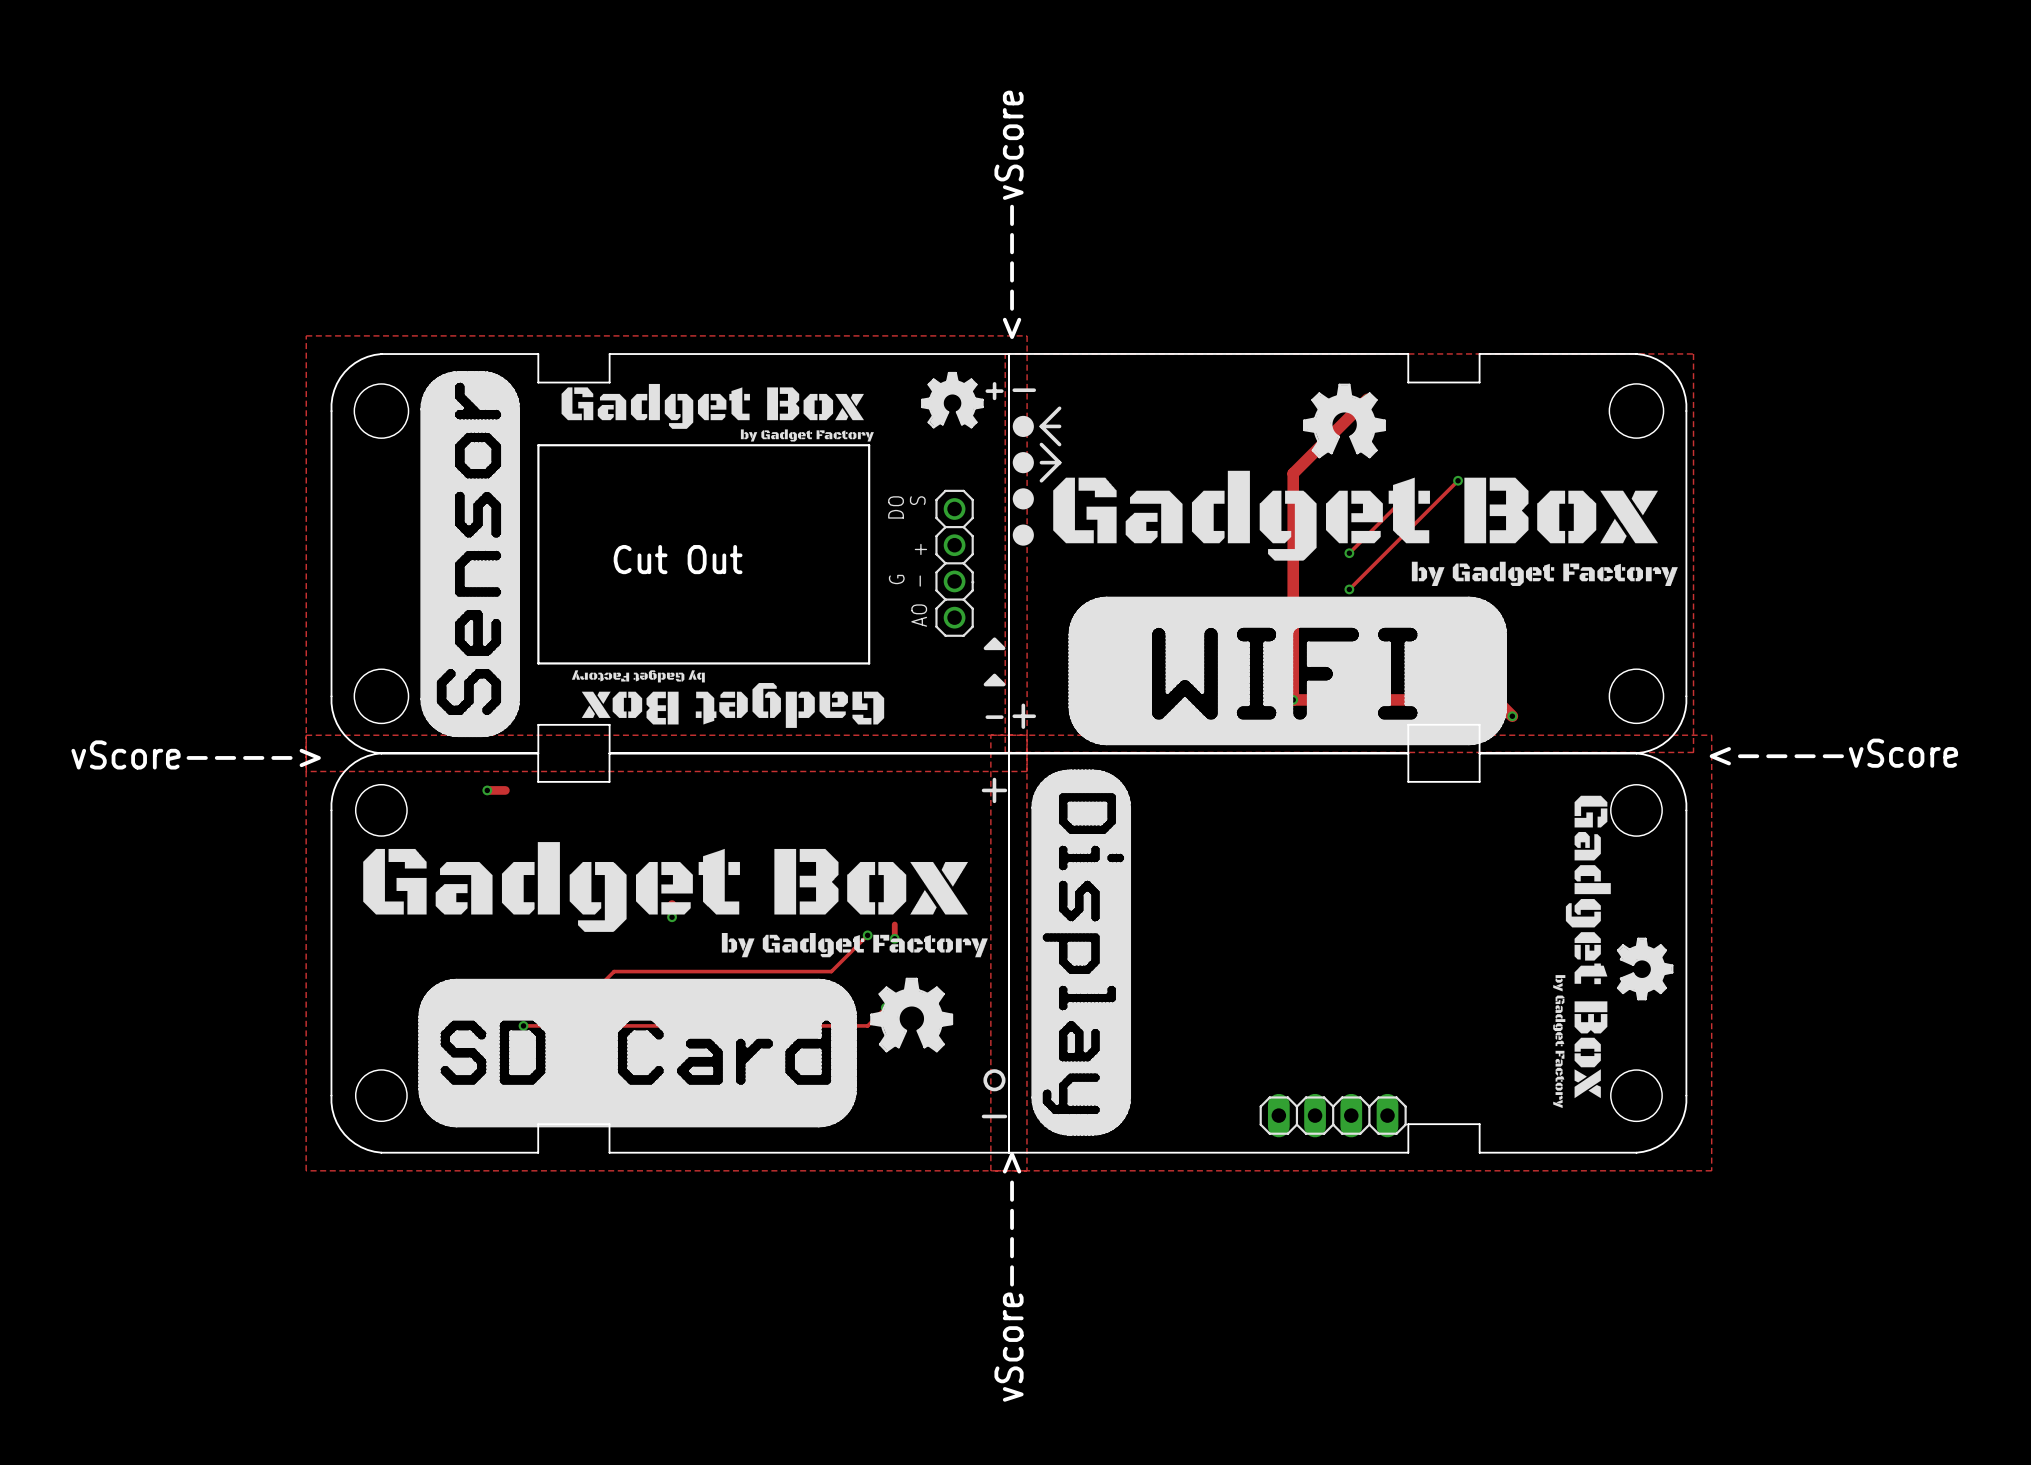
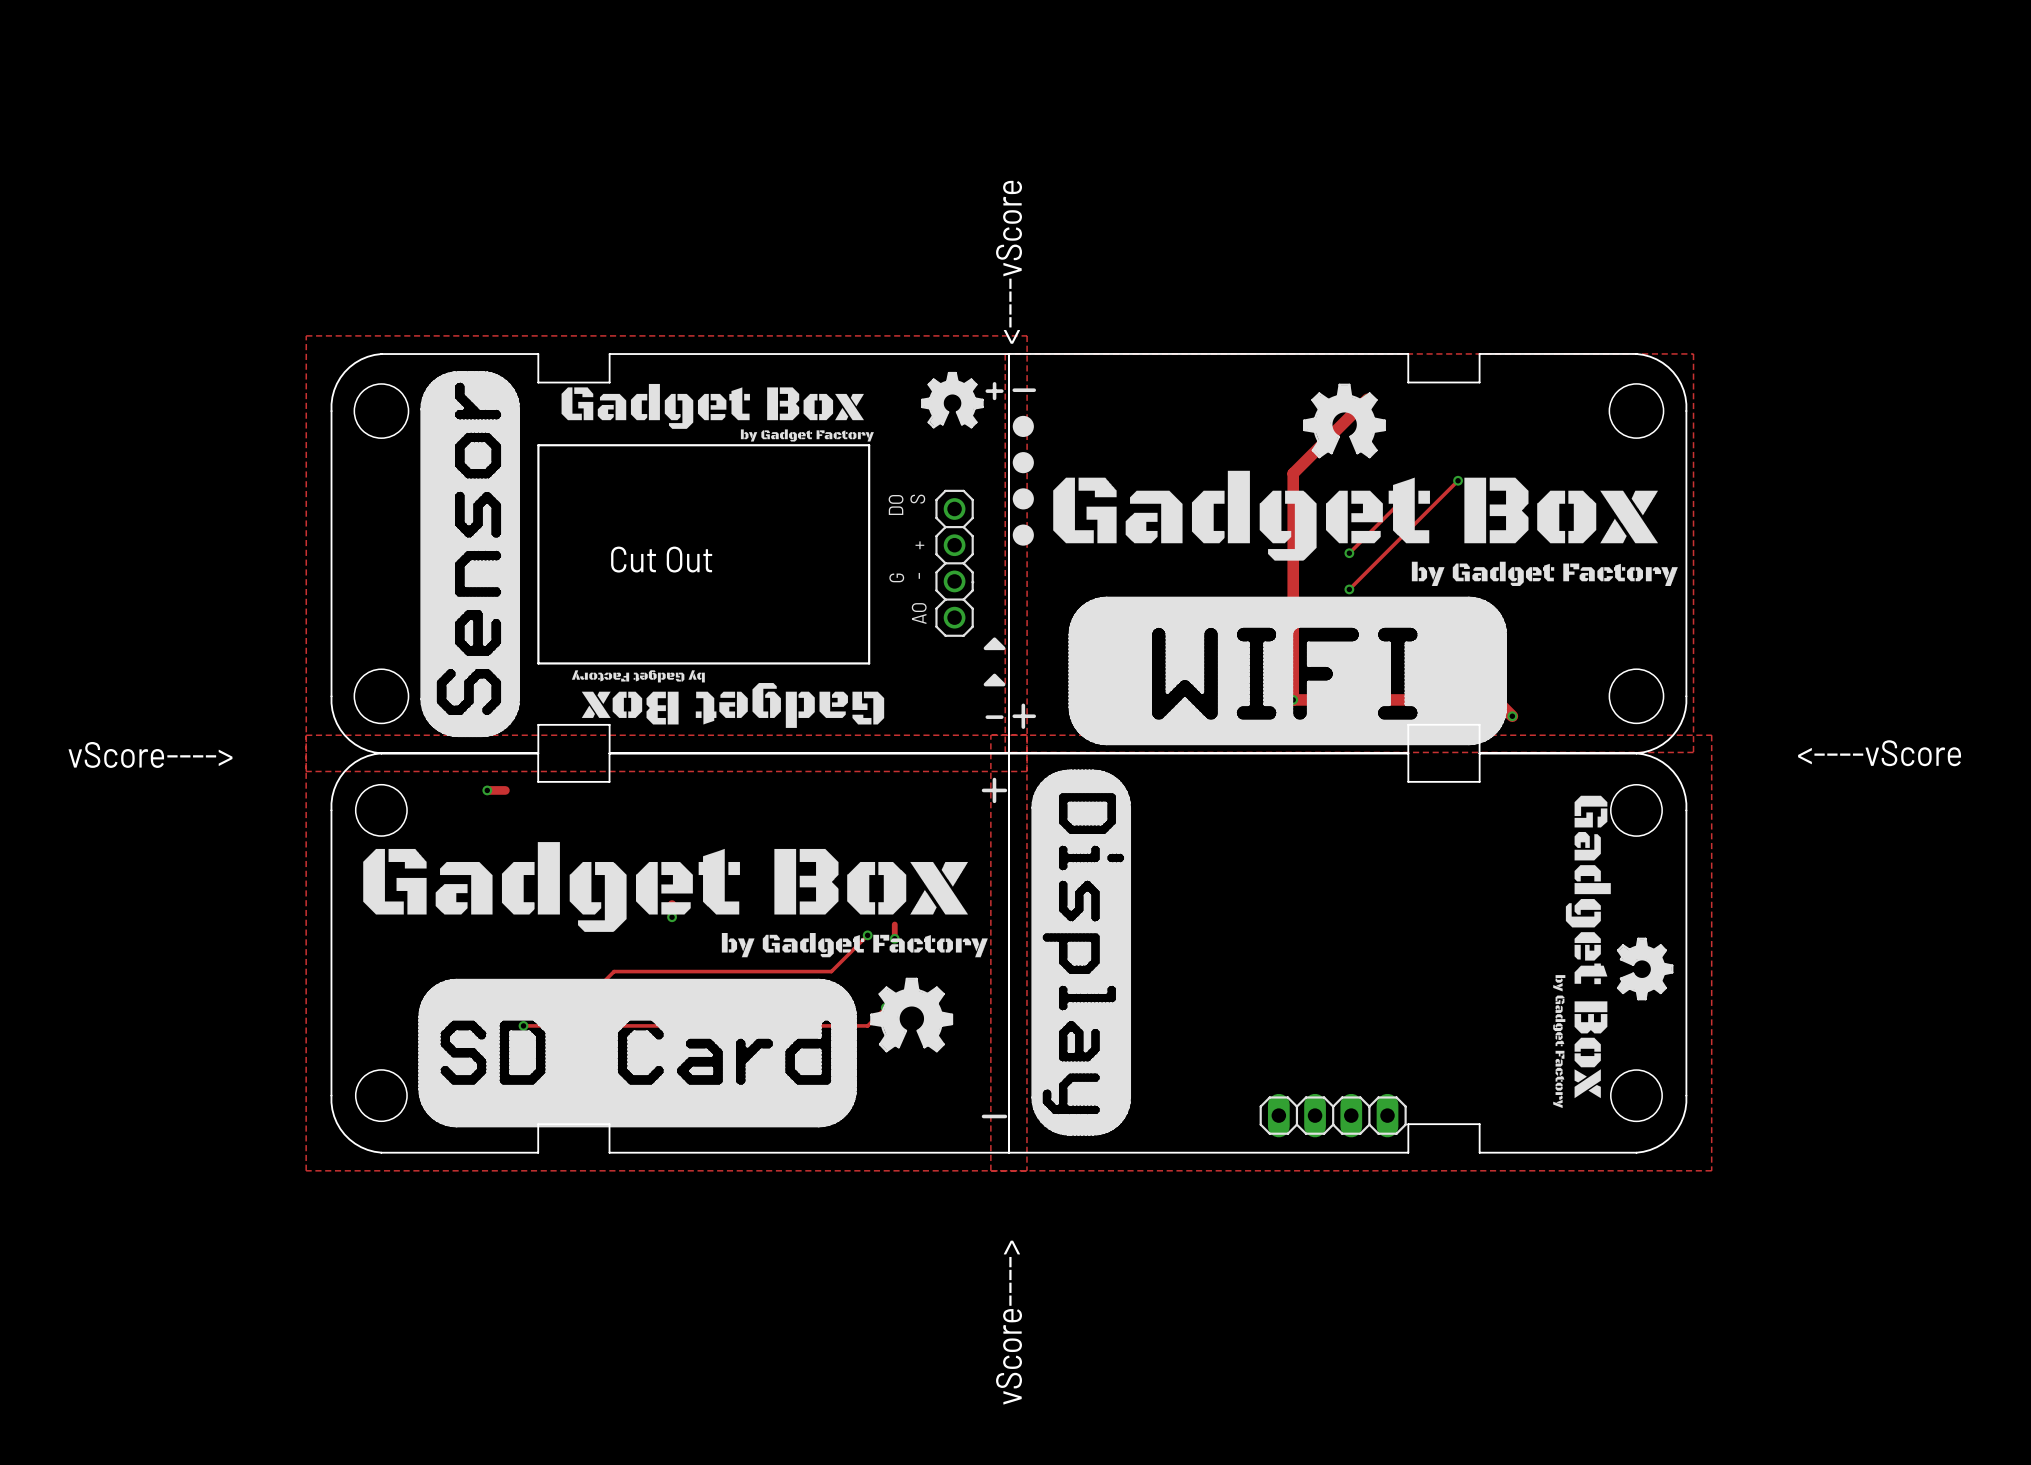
line: (1059, 408) (1041, 426) -> none
line: (1041, 426) (1059, 444) -> none
line: (1041, 426) (1059, 426) -> none
line: (1041, 444) (1059, 462) -> none
line: (1041, 462) (1059, 462) -> none
line: (1059, 462) (1041, 480) -> none
drawing: [983, 1069, 1006, 1092] -> none

